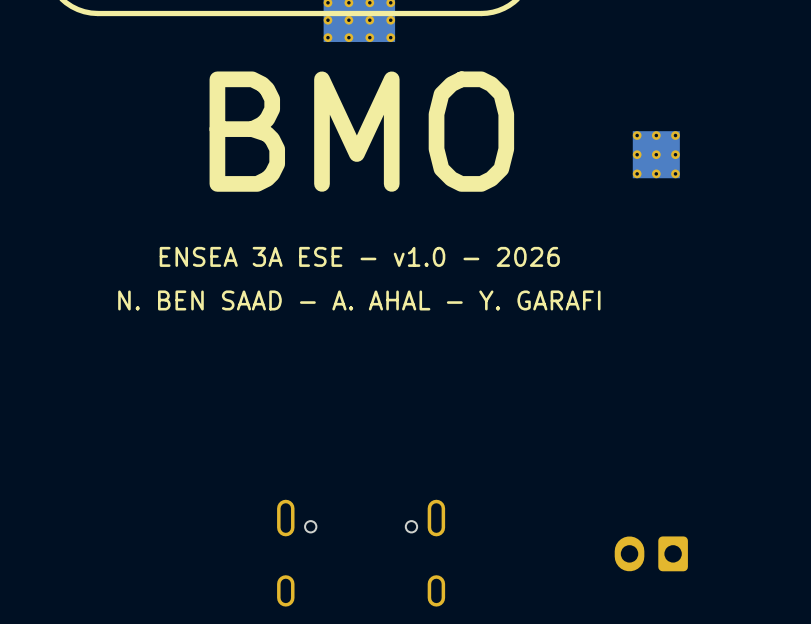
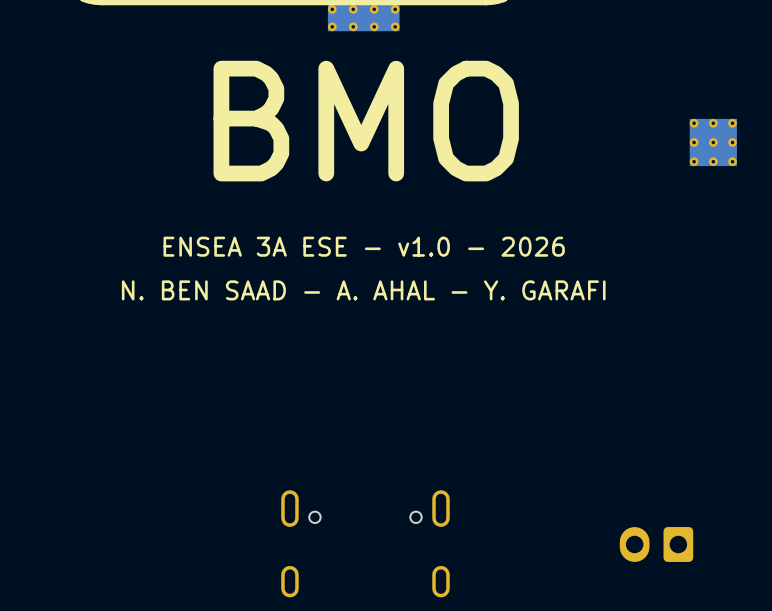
part position: (656, 154) -> (713, 142)

